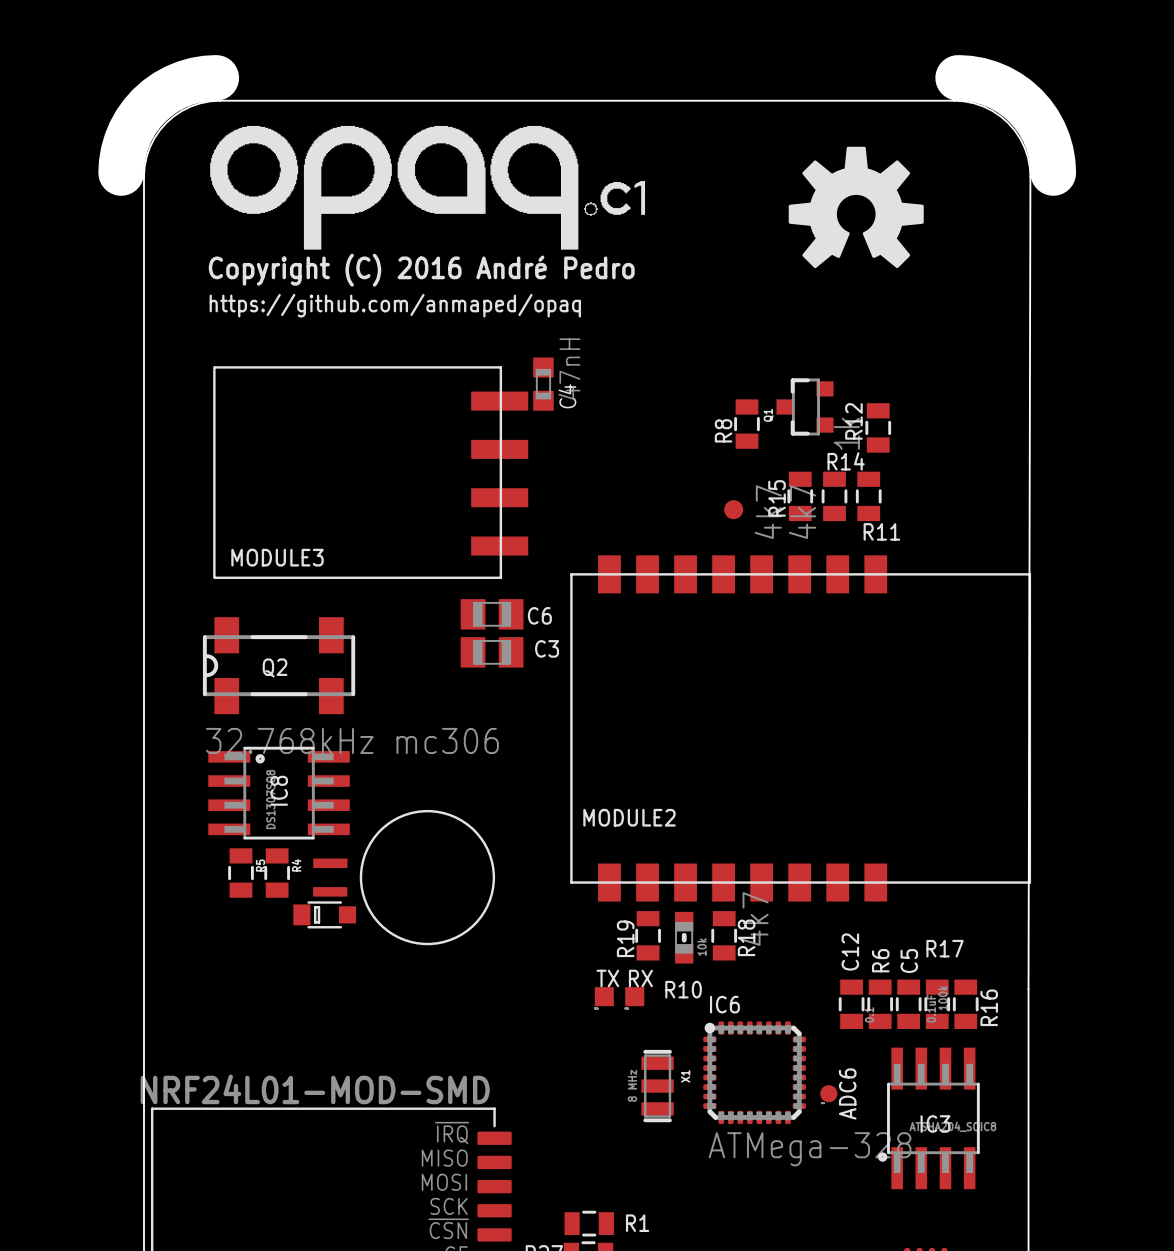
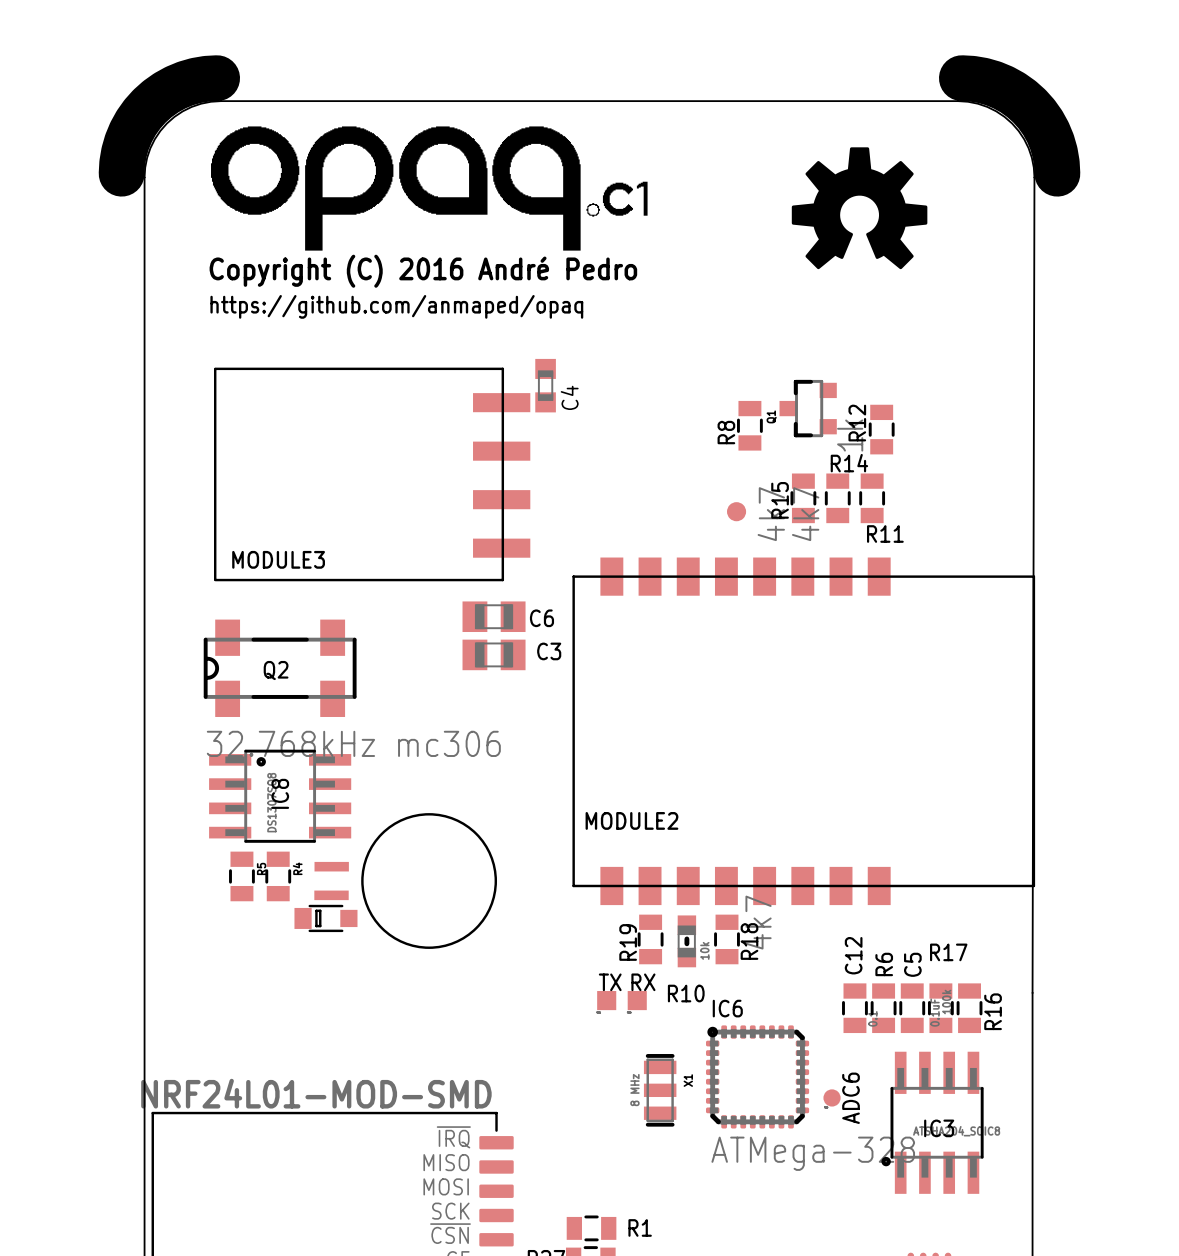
C4 value: 47nH (569, 369) -> none

